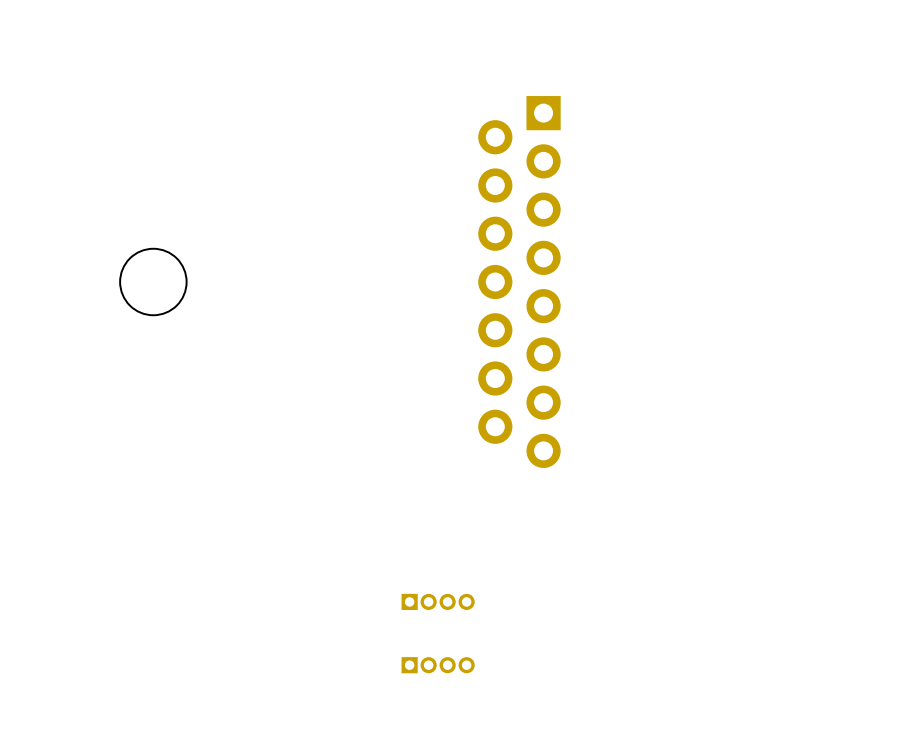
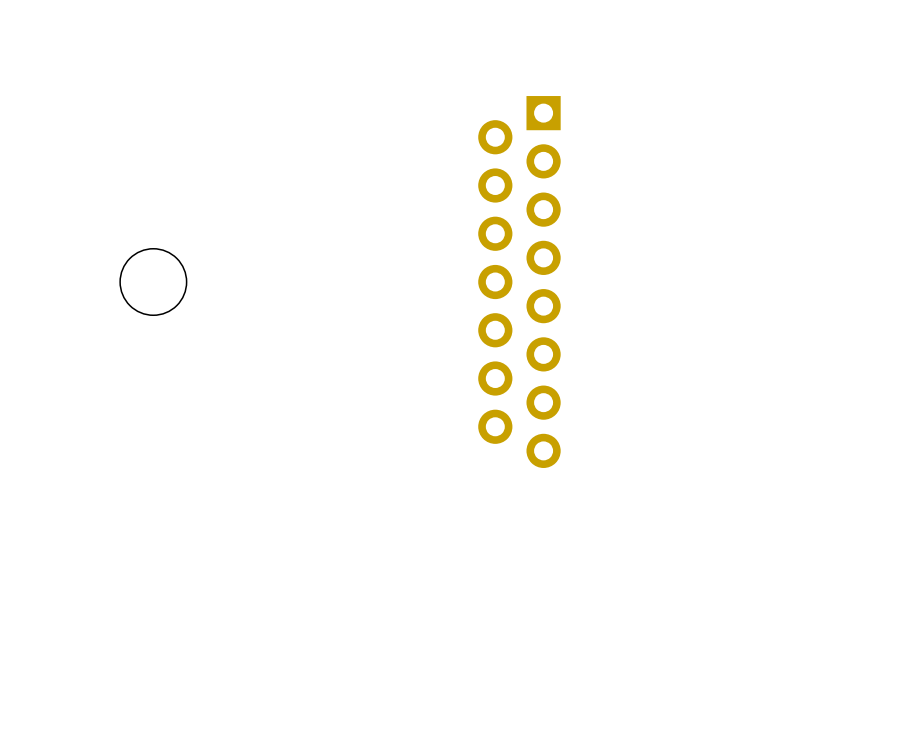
part: (438, 601) -> none
part: (438, 665) -> none

